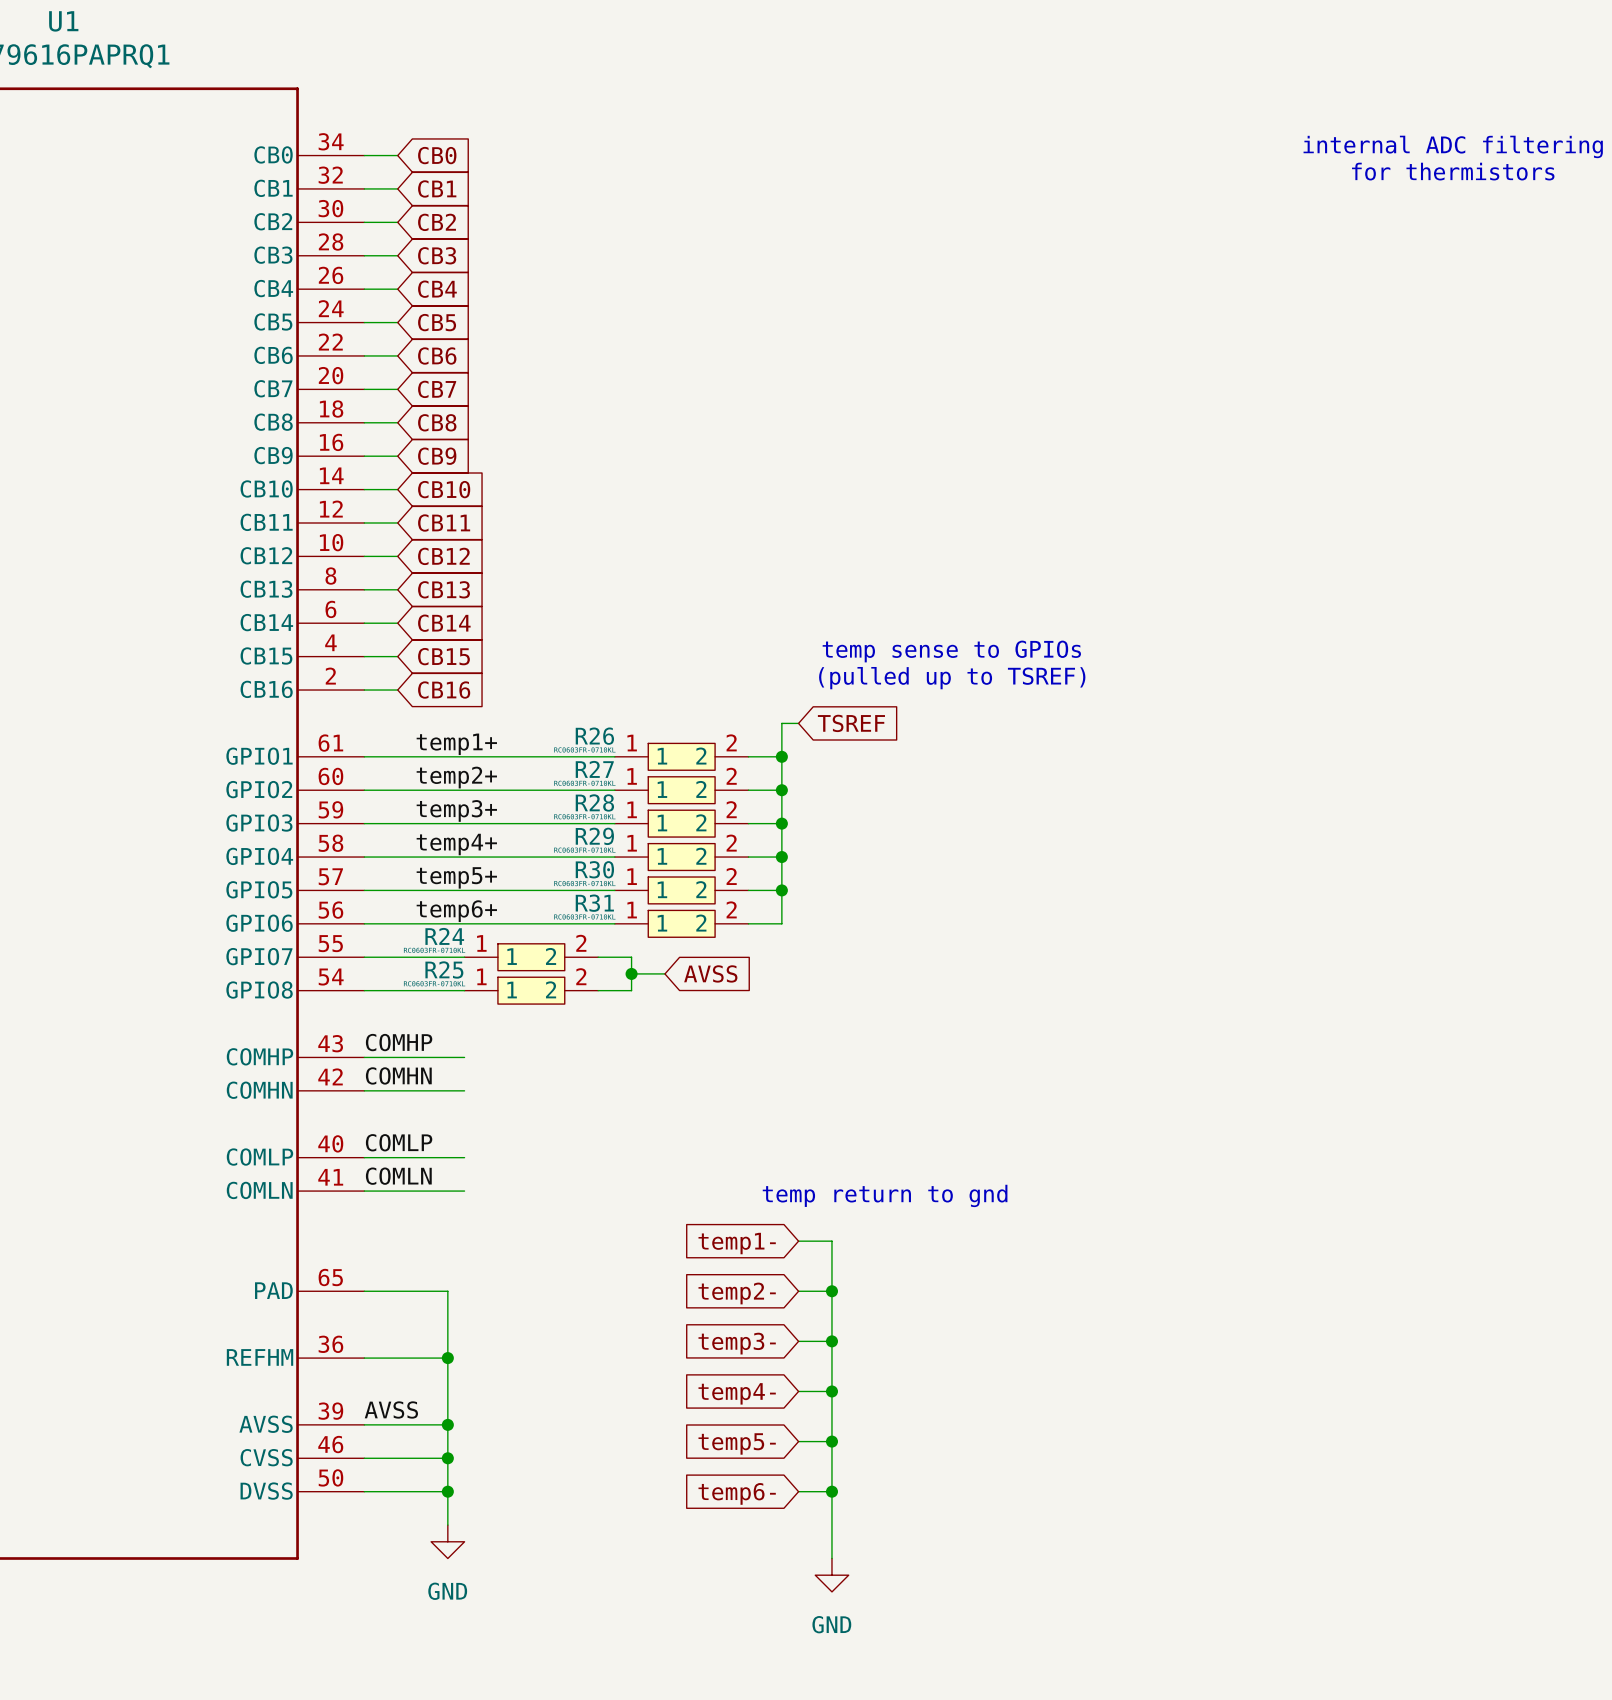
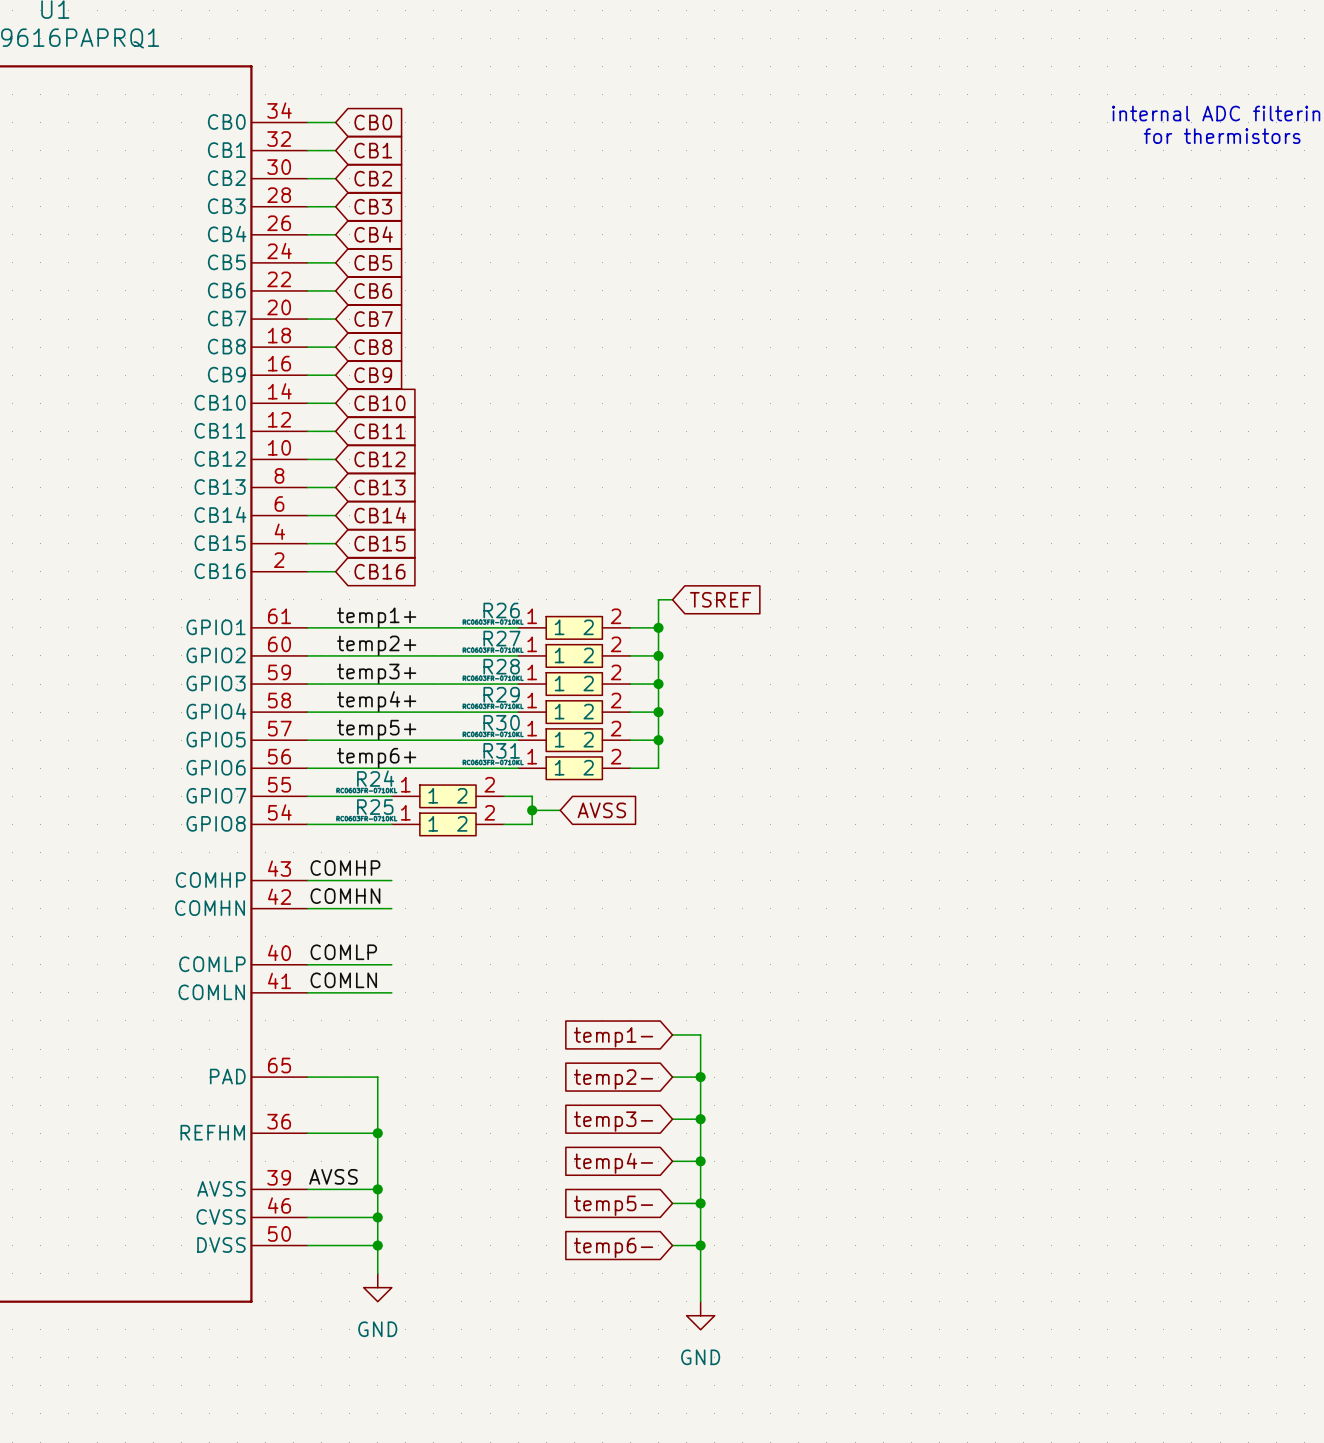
text: temp sense to GPIOs (951, 651) -> none
text: (pulled up to TSREF) (952, 678) -> none
text: temp return to gnd (885, 1195) -> none

